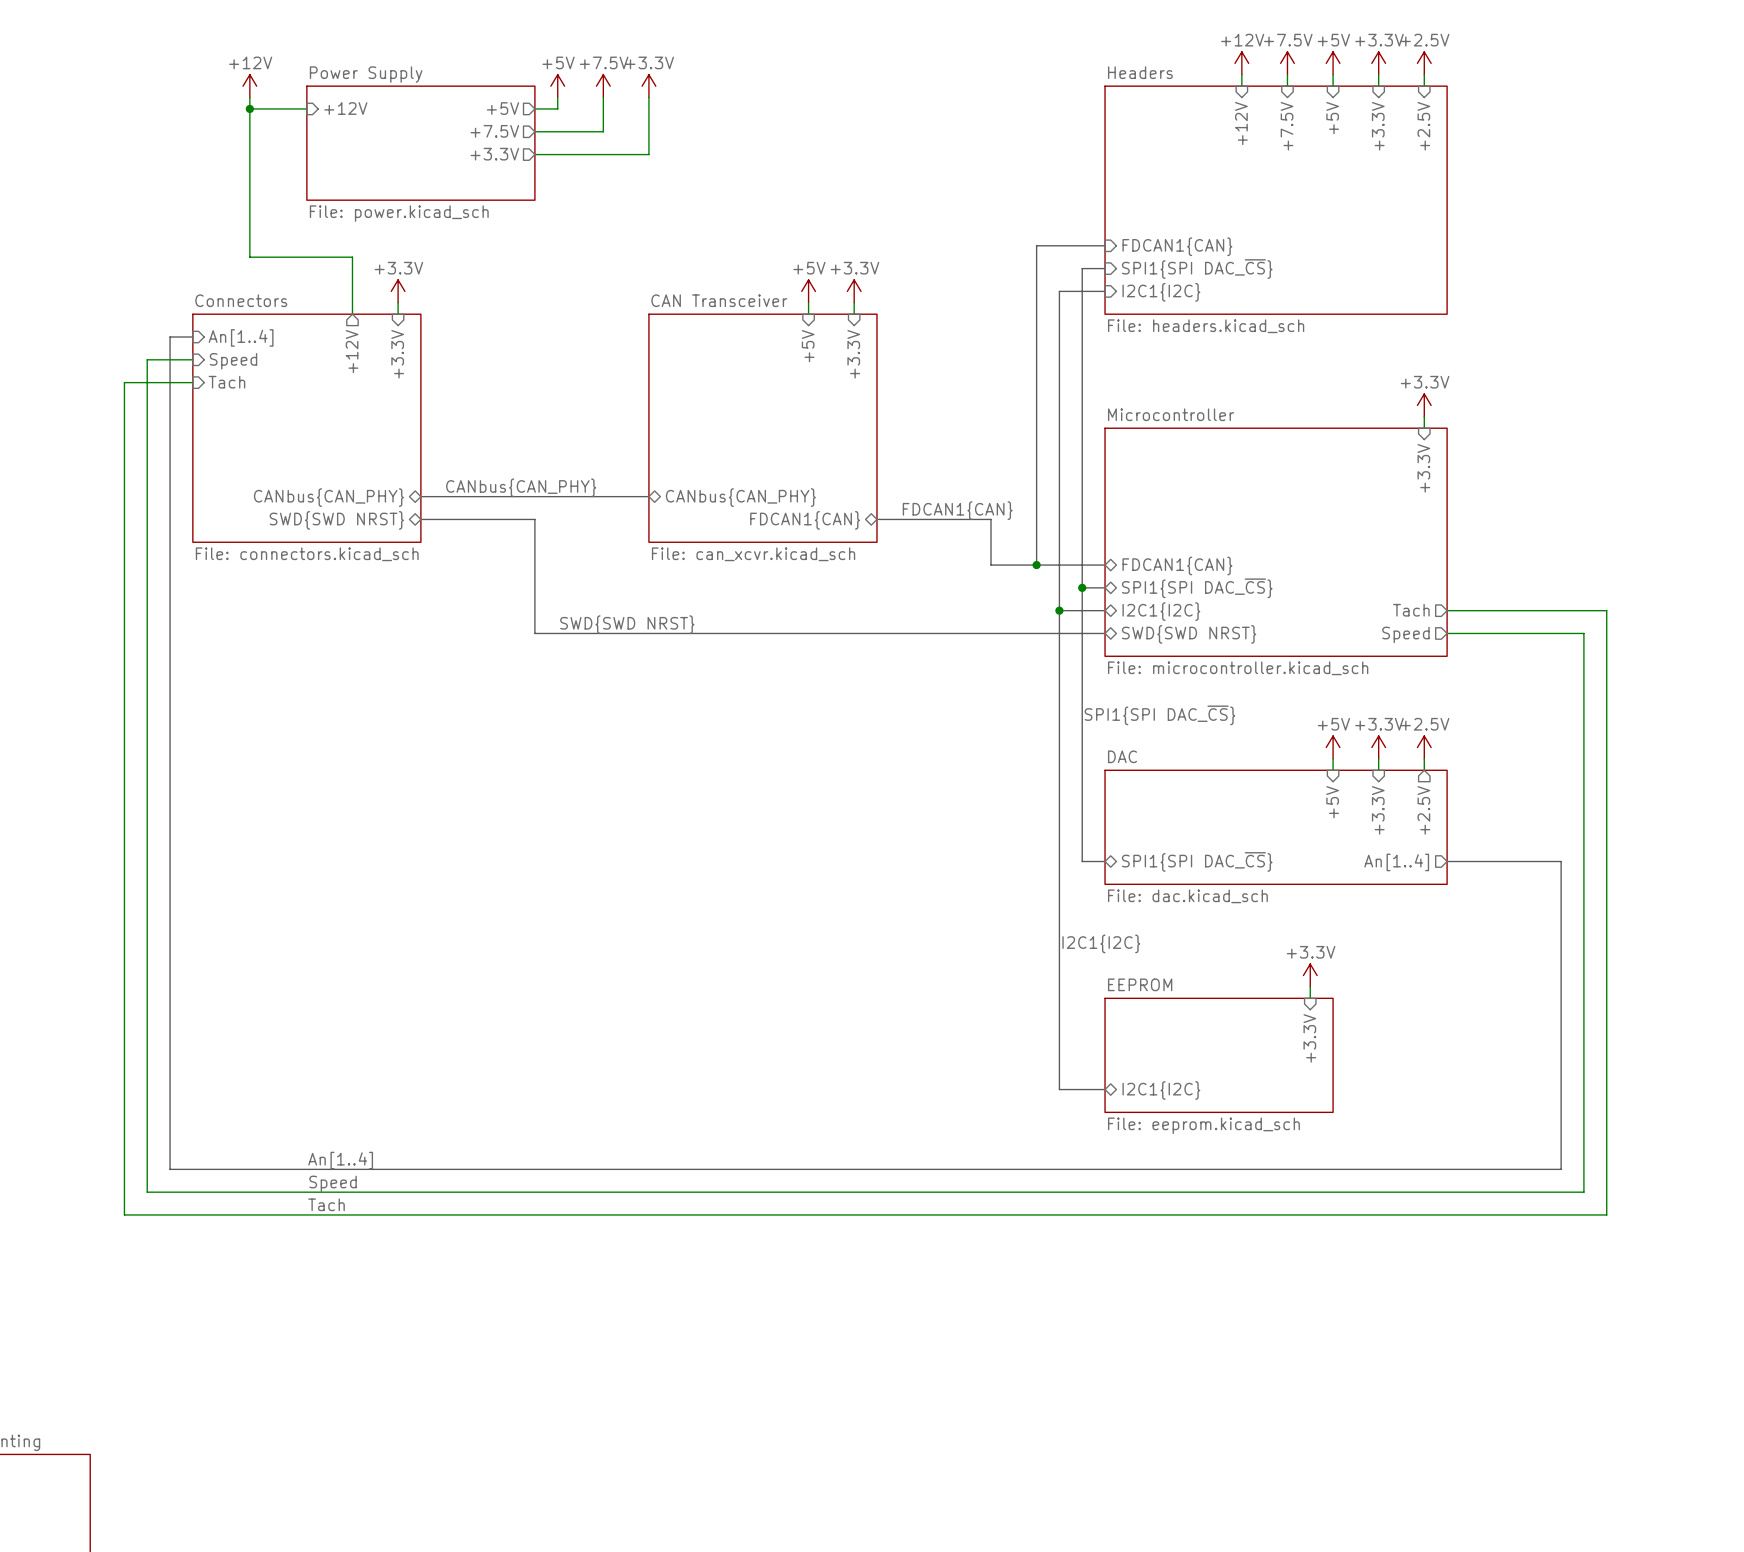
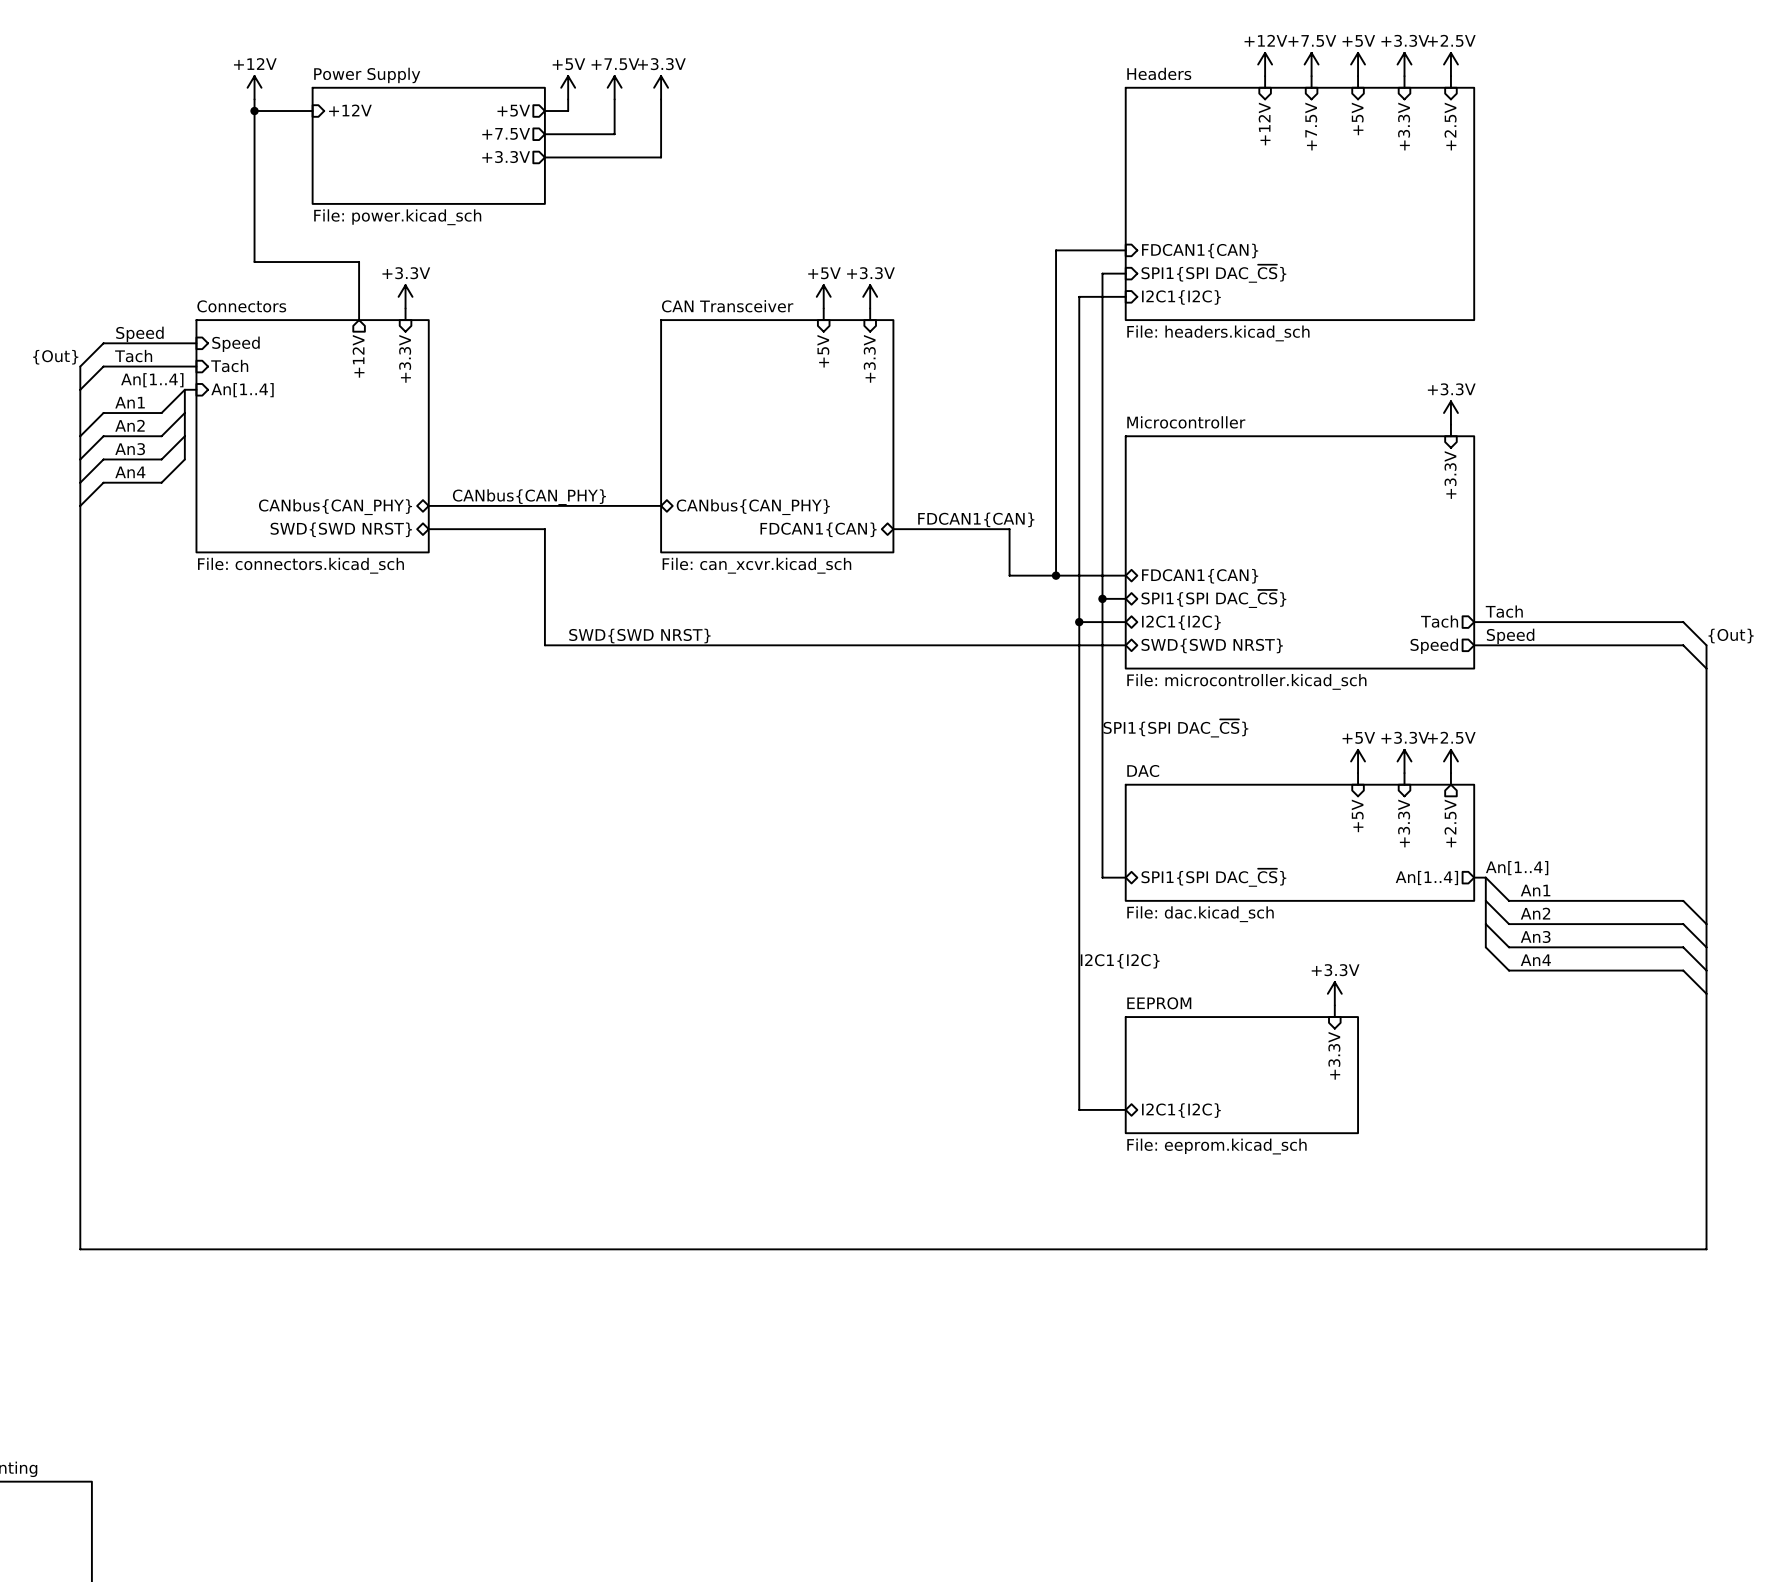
label: none -> Speed (139, 334)
bus: (192, 337) (170, 337) (170, 1169) (1561, 1169) (1561, 861) (1458, 861) -> (1485, 947) (1485, 877)
wire: none -> (196, 343) (103, 343) (80, 366)
sheet pin: An[1..4] (241, 337) -> Speed (235, 344)
label: none -> Tach (133, 356)
label: none -> {Out} (55, 357)
bus: none -> (80, 366) (80, 1249) (1706, 1249) (1706, 645)
wire: (147, 359) (147, 1192) (1583, 1192) (1583, 633) -> (150, 366) (103, 366) (80, 389)
sheet pin: Speed (233, 361) -> Tach (229, 365)
label: none -> An[1..4] (152, 380)
wire: none -> (184, 389) (161, 413) (103, 413) (80, 436)
bus: none -> (196, 389) (184, 389) (184, 459)
wire: (192, 382) (124, 382) (124, 1214) (1606, 1214) (1606, 610) -> (1706, 645) (1683, 622) (1636, 622)
sheet pin: Tach (226, 382) -> An[1..4] (242, 390)
label: none -> An1 (130, 402)
wire: none -> (184, 413) (161, 436) (103, 436) (80, 459)
label: none -> An2 (129, 425)
wire: none -> (184, 436) (161, 459) (103, 459) (80, 482)
label: none -> An3 (130, 449)
wire: none -> (184, 459) (161, 482) (103, 482) (80, 505)
label: none -> An4 (130, 472)
label: none -> Tach (1504, 611)
label: none -> {Out} (1731, 636)
label: none -> Speed (1510, 636)
wire: none -> (1613, 645) (1683, 645) (1706, 668)
label: none -> An[1..4] (1517, 868)
wire: none -> (1485, 877) (1509, 900) (1683, 900) (1706, 924)
label: none -> An1 (1535, 890)
wire: none -> (1485, 900) (1509, 924) (1683, 924) (1706, 947)
label: none -> An2 (1535, 913)
wire: none -> (1485, 924) (1509, 947) (1683, 947) (1706, 970)
label: none -> An3 (1535, 936)
wire: none -> (1485, 947) (1509, 970) (1683, 970) (1706, 993)
label: none -> An4 (1535, 960)
label: An[1..4] (340, 1160) -> none
label: Speed (333, 1183) -> none
label: Tach (326, 1204) -> none

